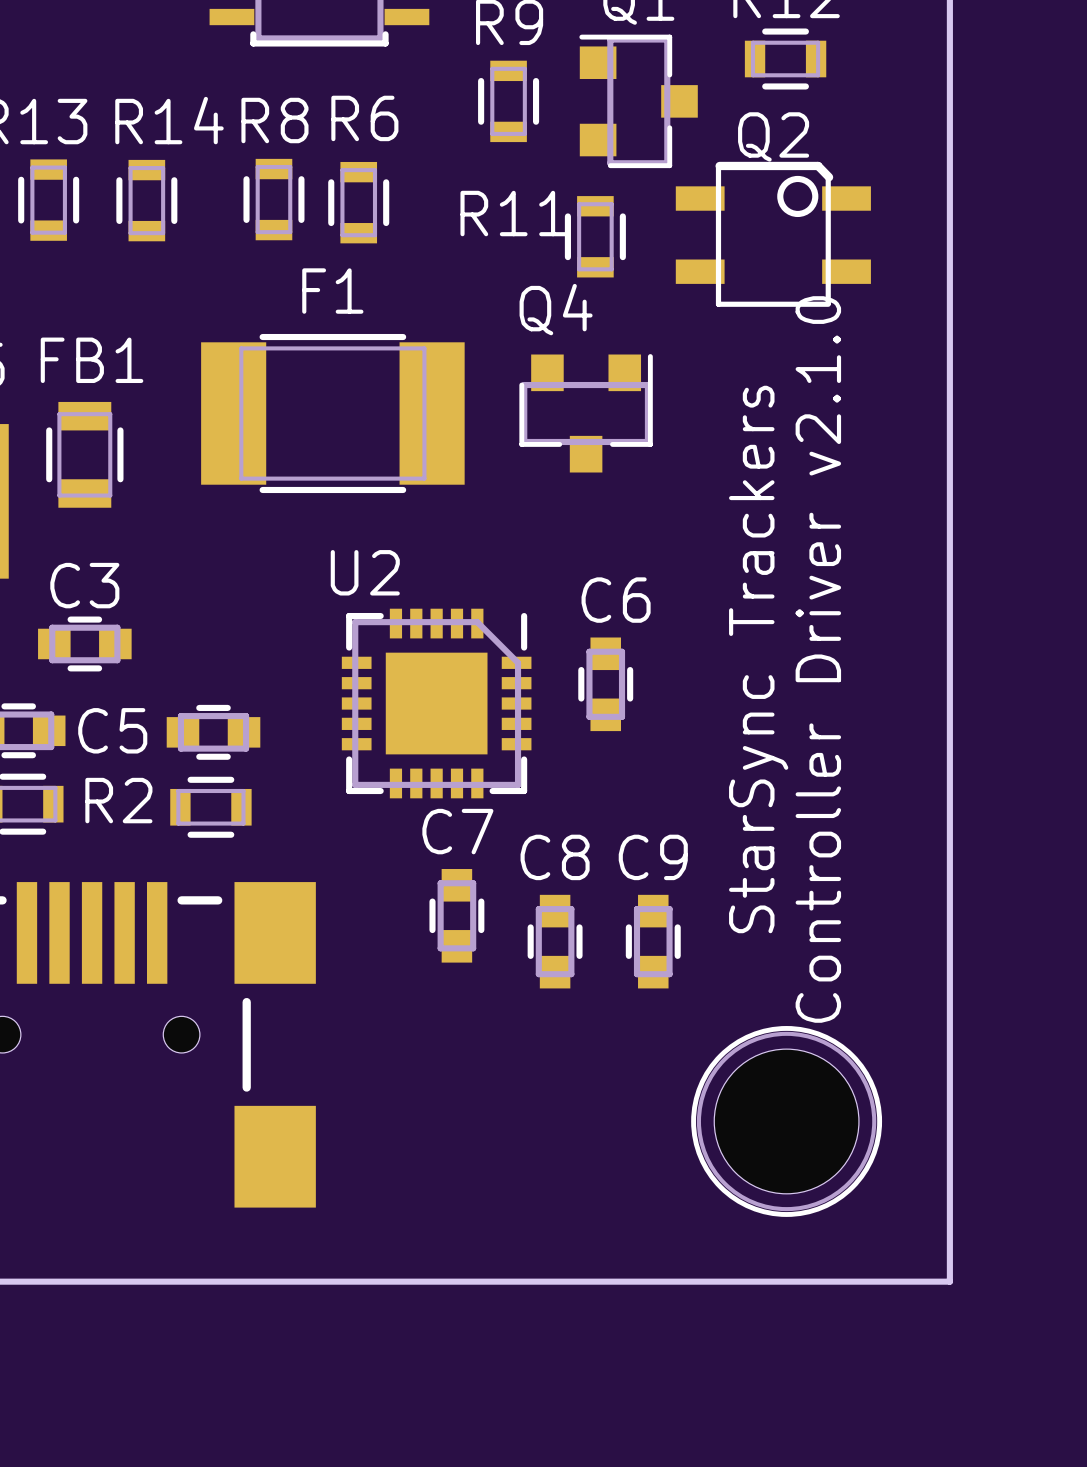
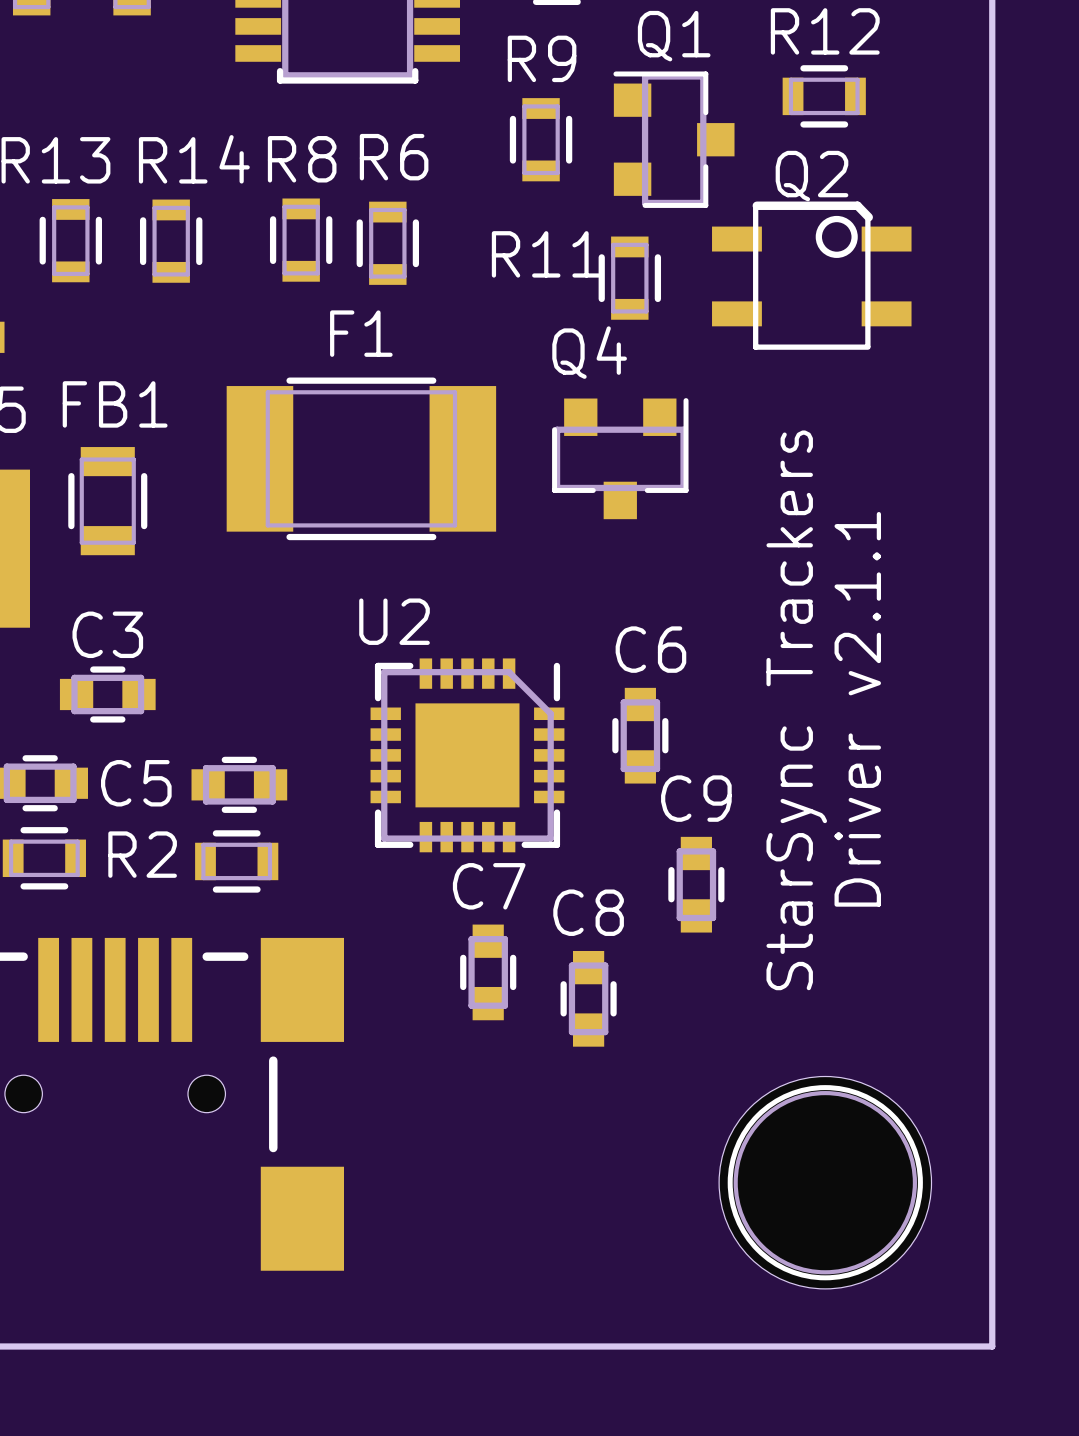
text: Controller Driver v2.1.0 (818, 659) -> Driver v2.1.1 (857, 709)
C9 position: (653, 941) -> (696, 884)
part footprint: [691, 1026, 883, 1217] -> [719, 1076, 932, 1289]

